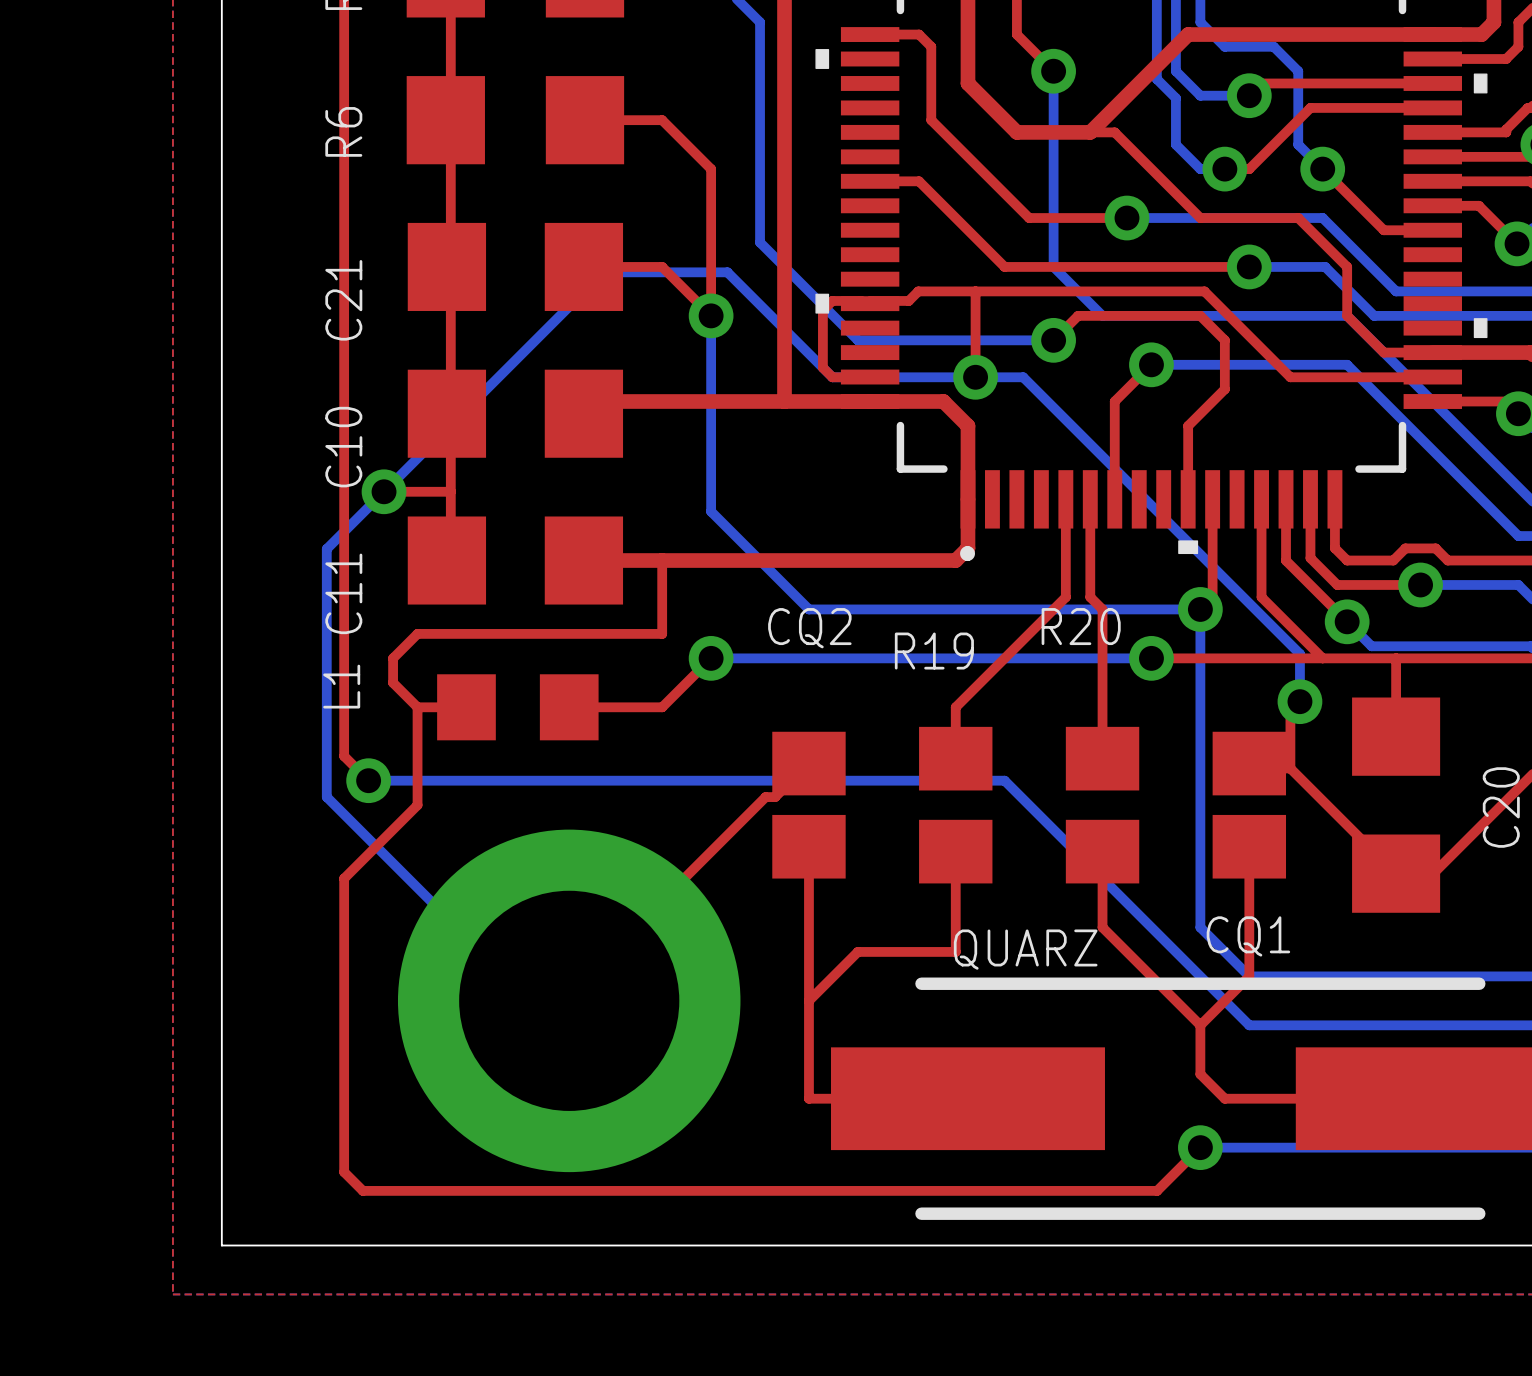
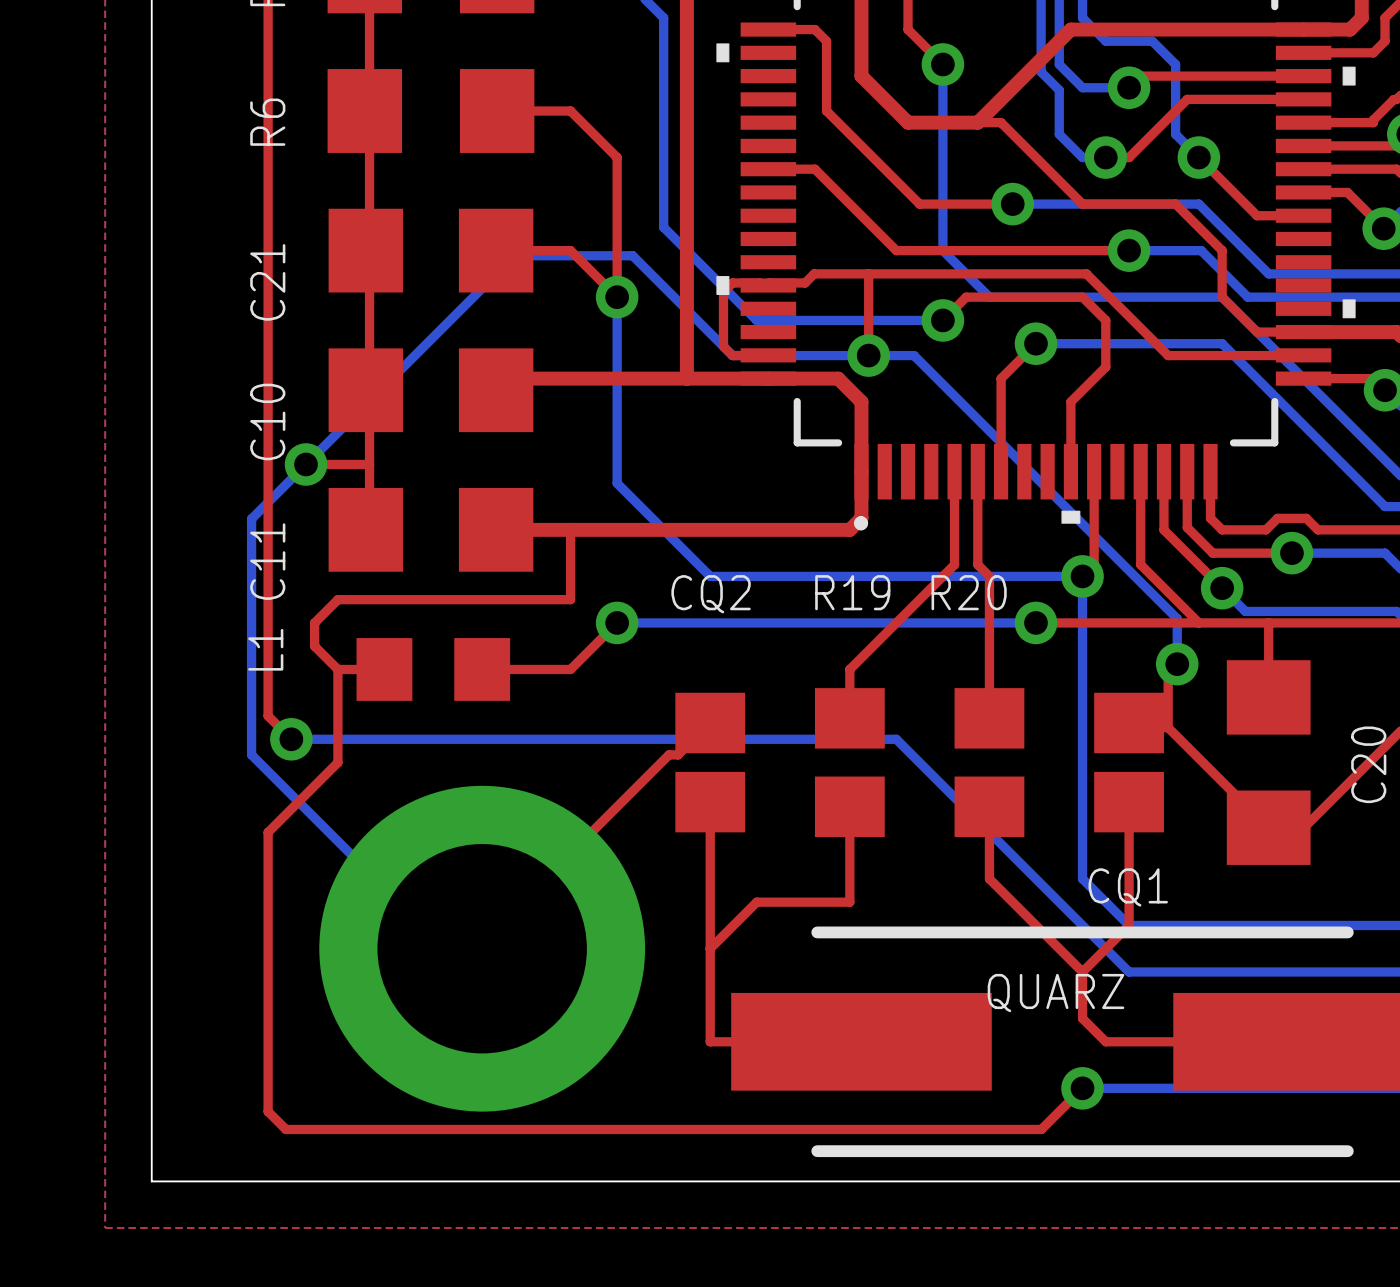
R19 name position: R19 (934, 651) -> R19 (852, 592)
QUARZ name position: QUARZ (1025, 949) -> QUARZ (1055, 993)

